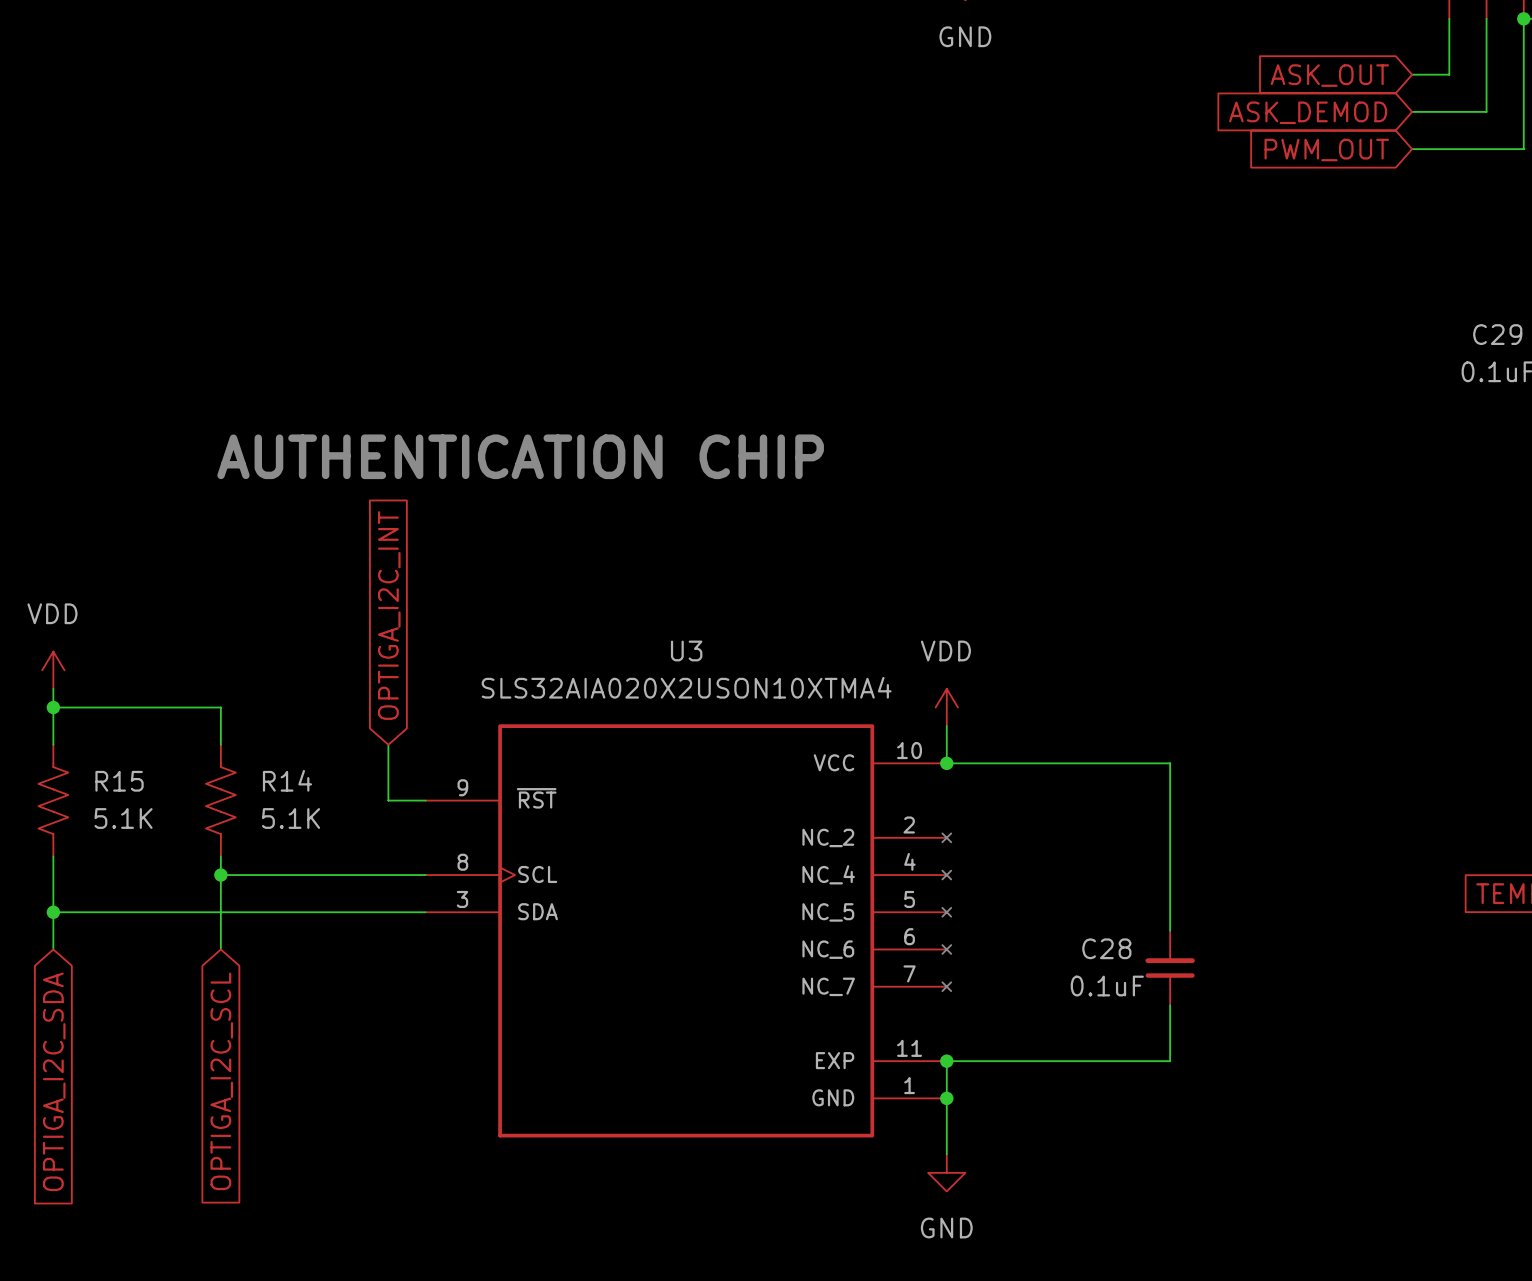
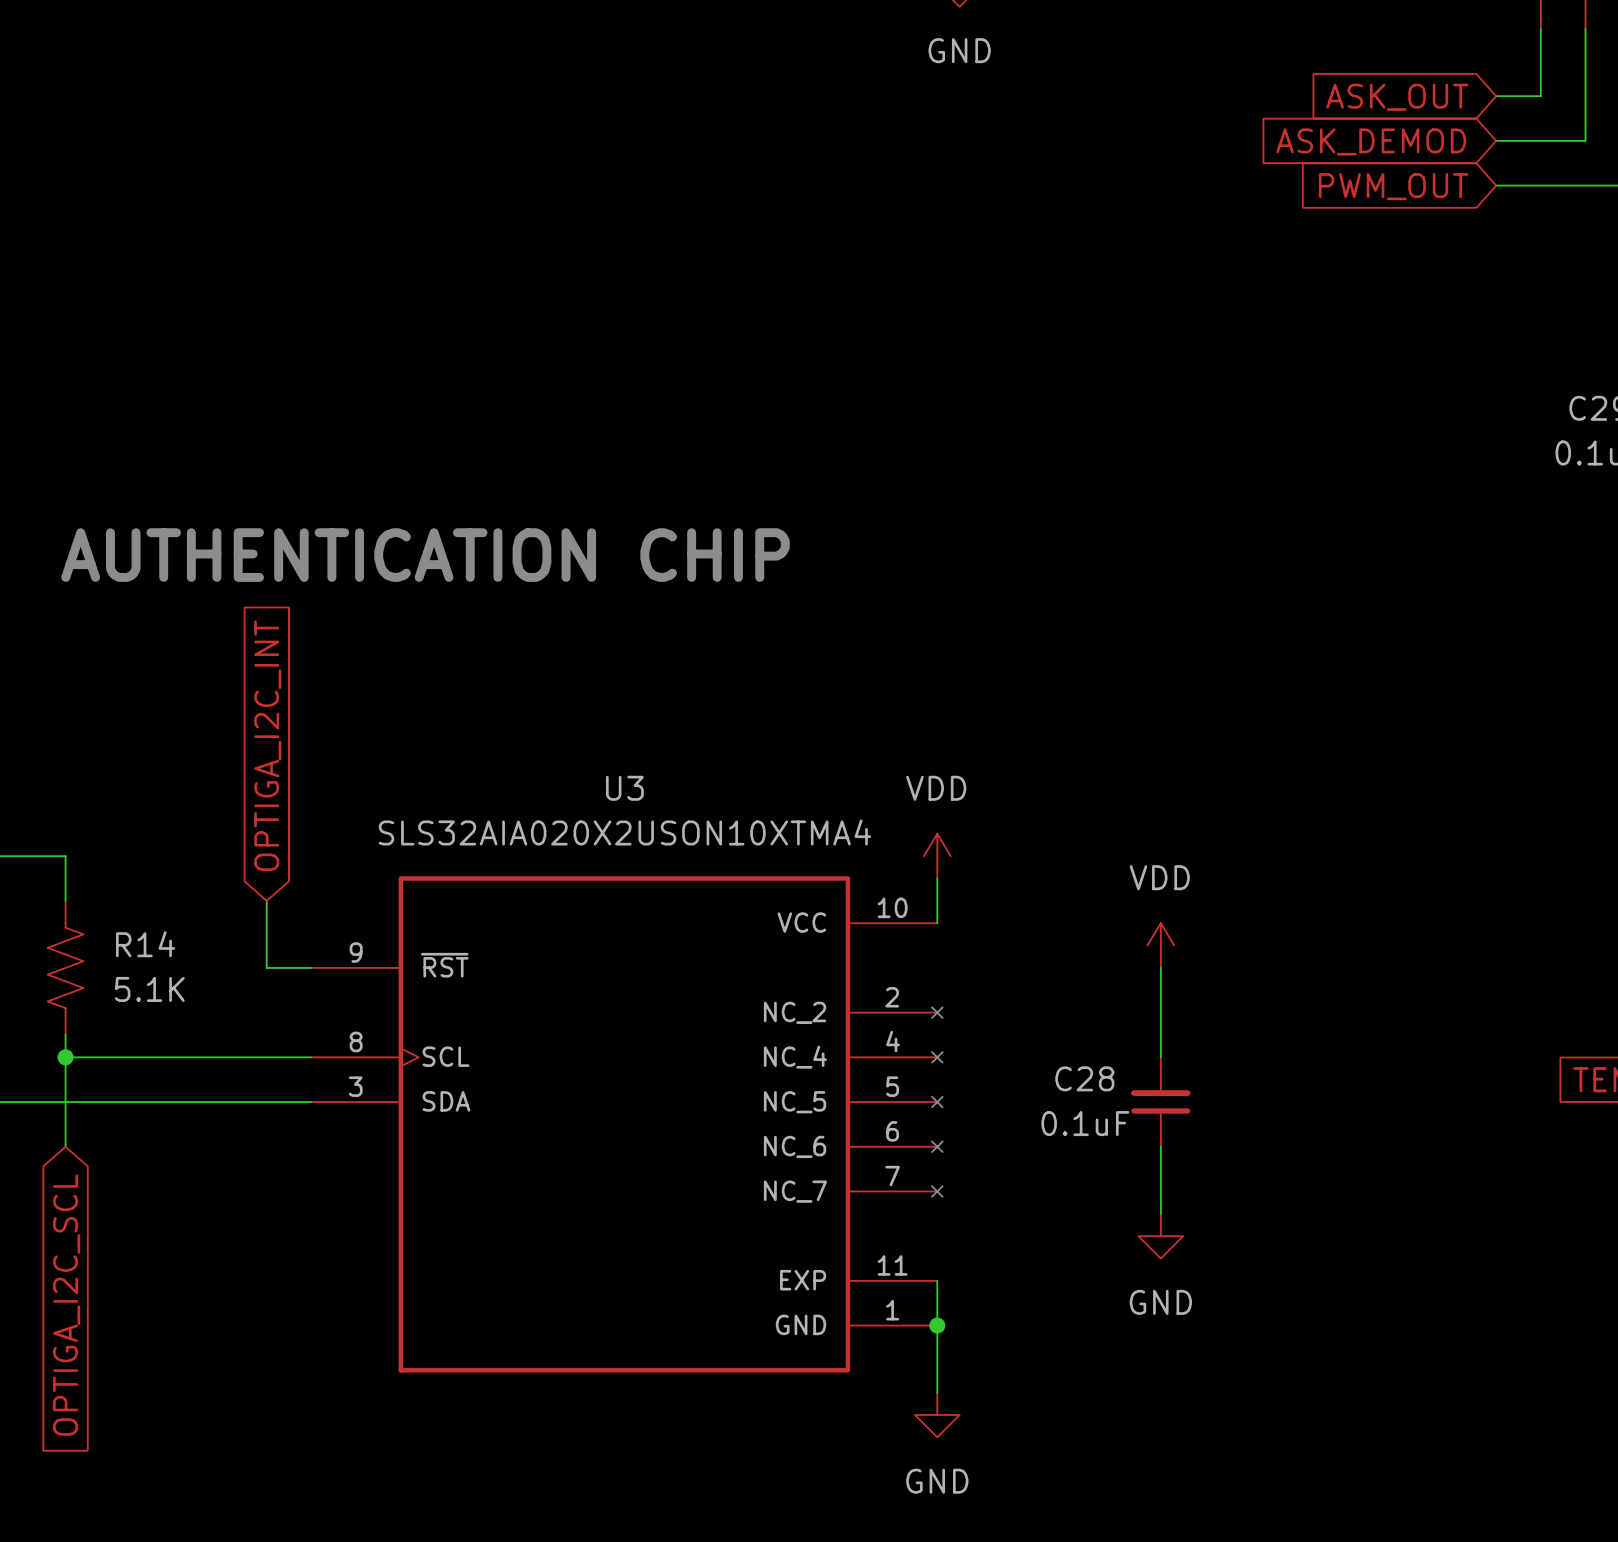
wire: (946, 763) (1170, 763) (1170, 930) -> none
junction: (946, 763) -> none
power symbol: none -> VDD (1160, 945)
wire: none -> (1160, 967) (1160, 1057)
wire: none -> (1160, 1146) (1160, 1213)
C28 position: (1170, 968) -> (1160, 1102)
wire: (1170, 1005) (1170, 1061) (946, 1061) -> none
power symbol: none -> GND (1160, 1236)
junction: (946, 1061) -> none

